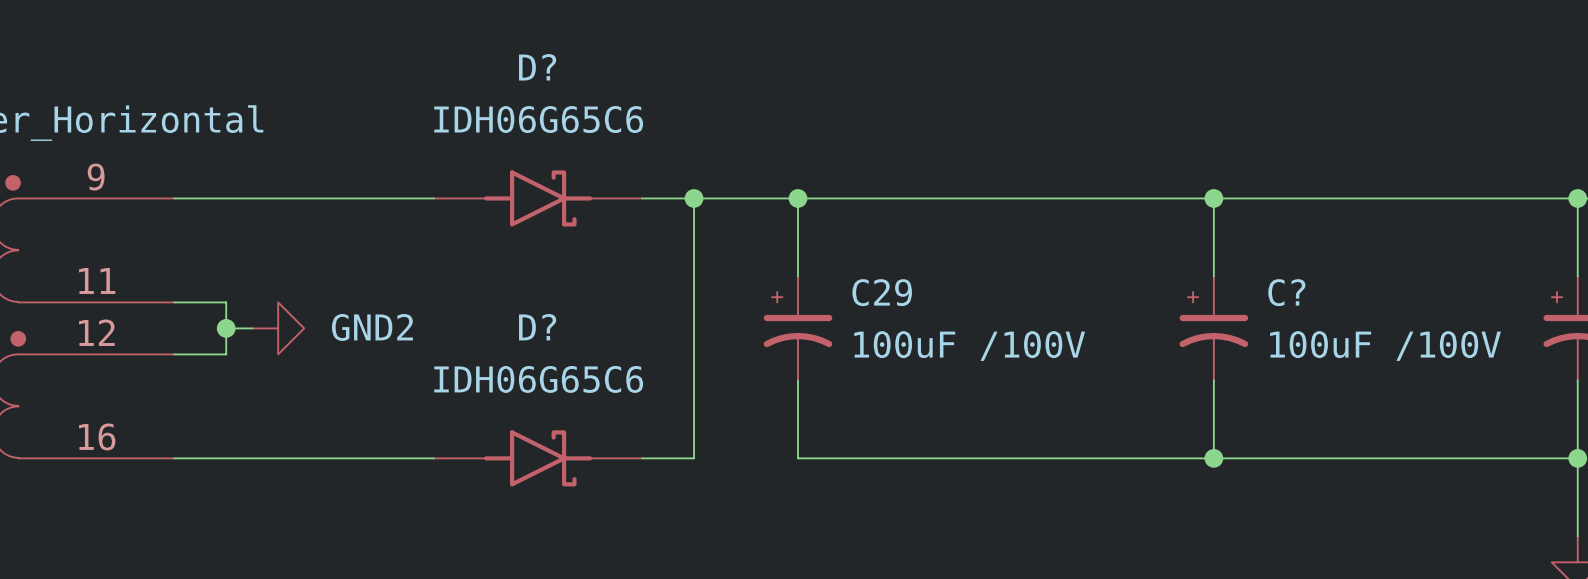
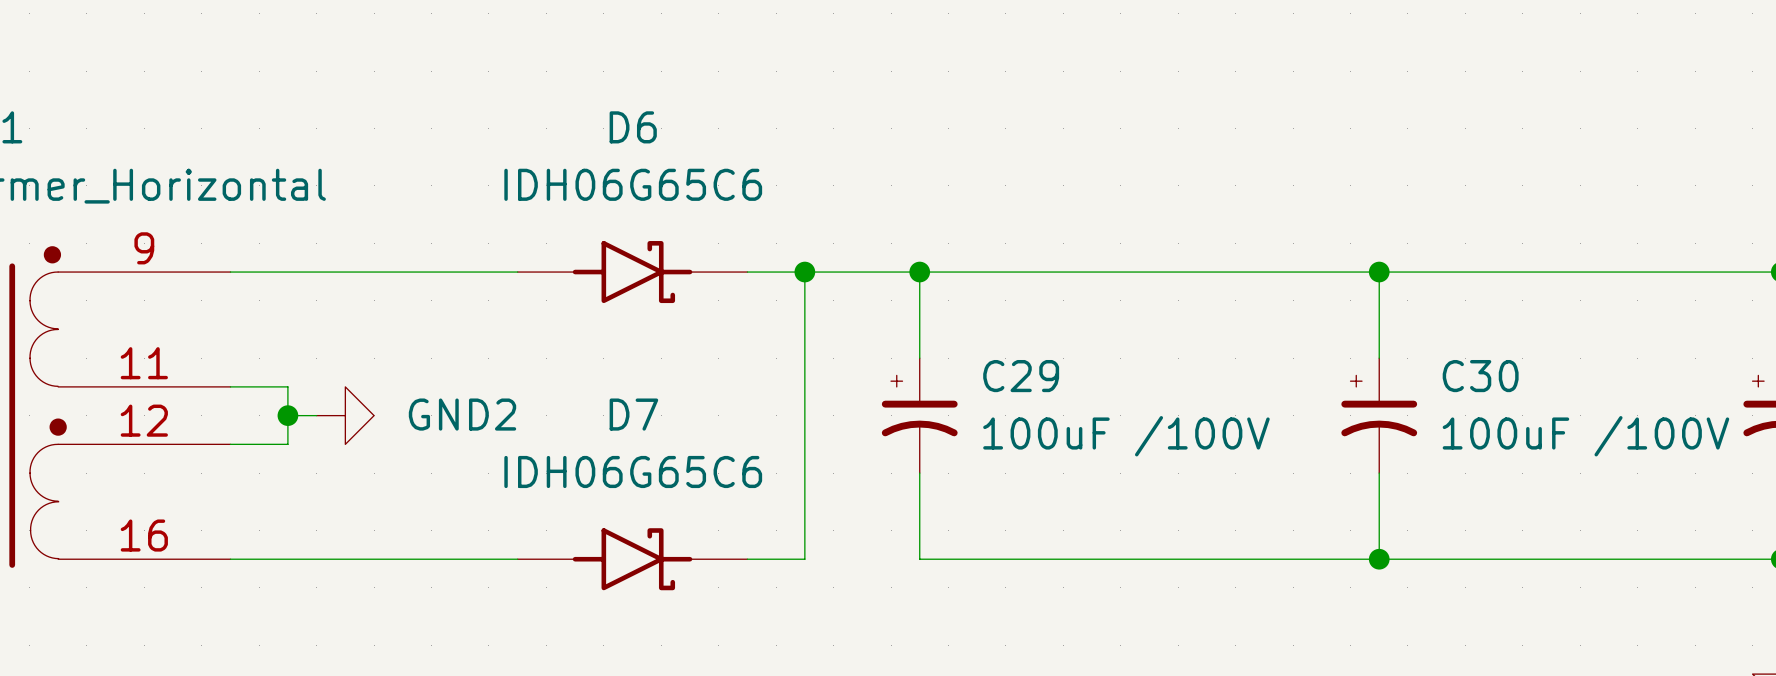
D? name: D? (537, 67) -> D6 (633, 127)
C? name: C? (1286, 292) -> C30 (1480, 376)
D? name: D? (537, 327) -> D7 (633, 414)

